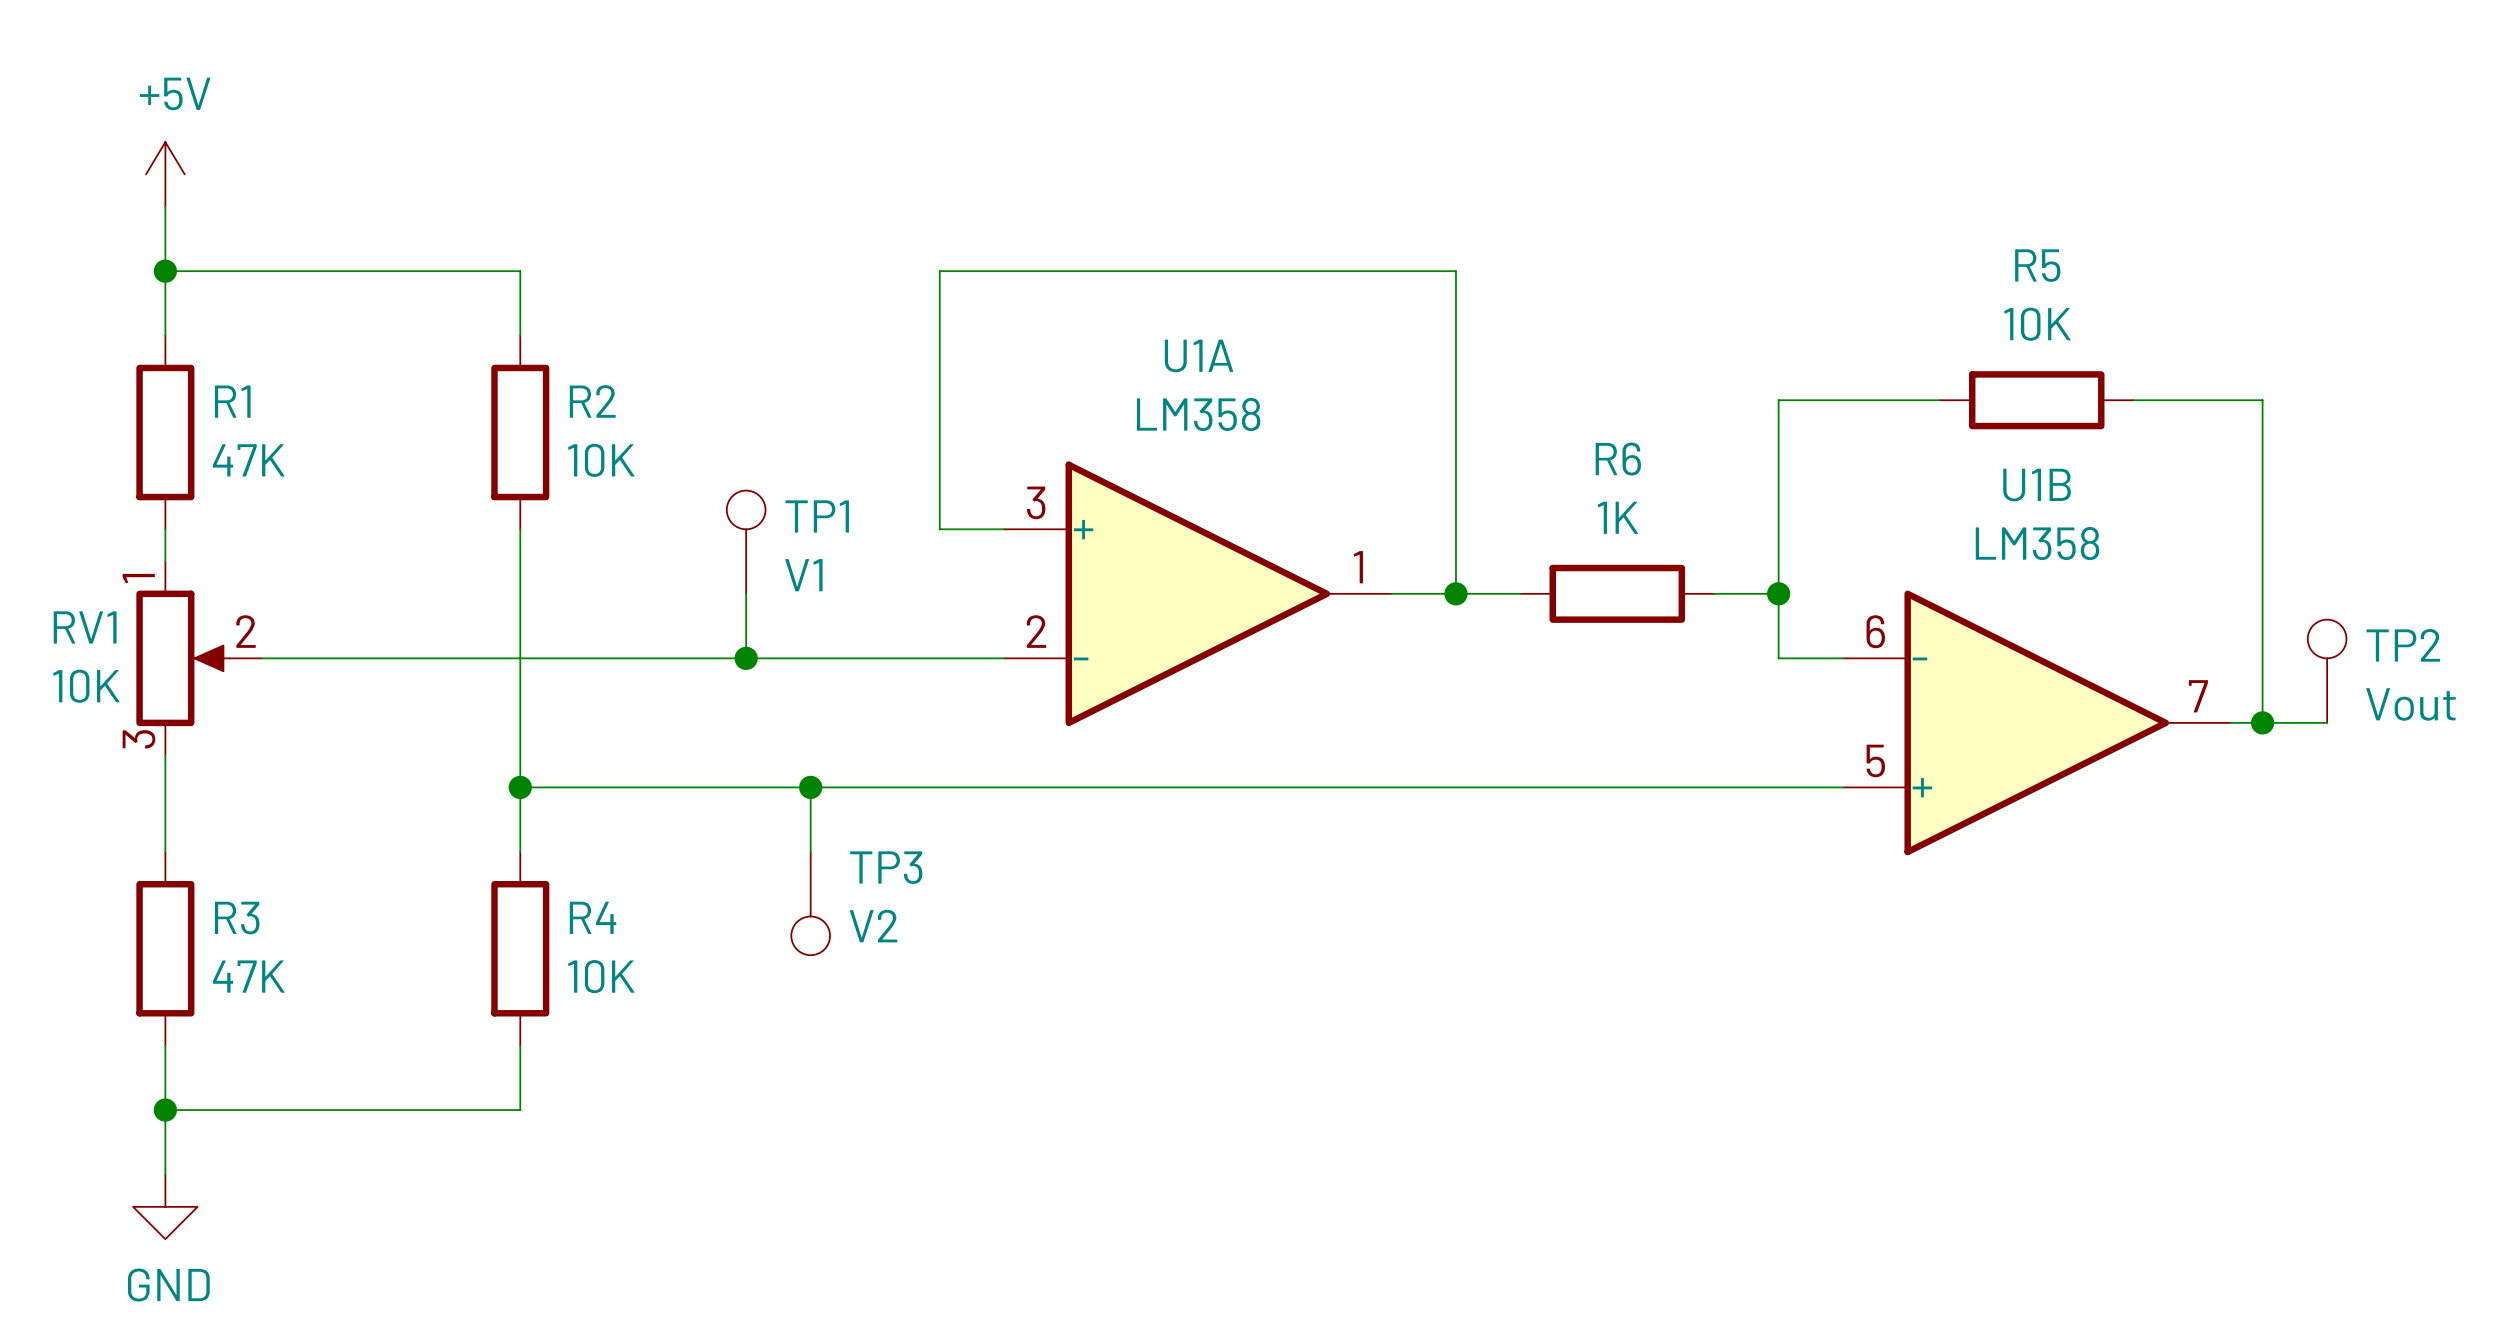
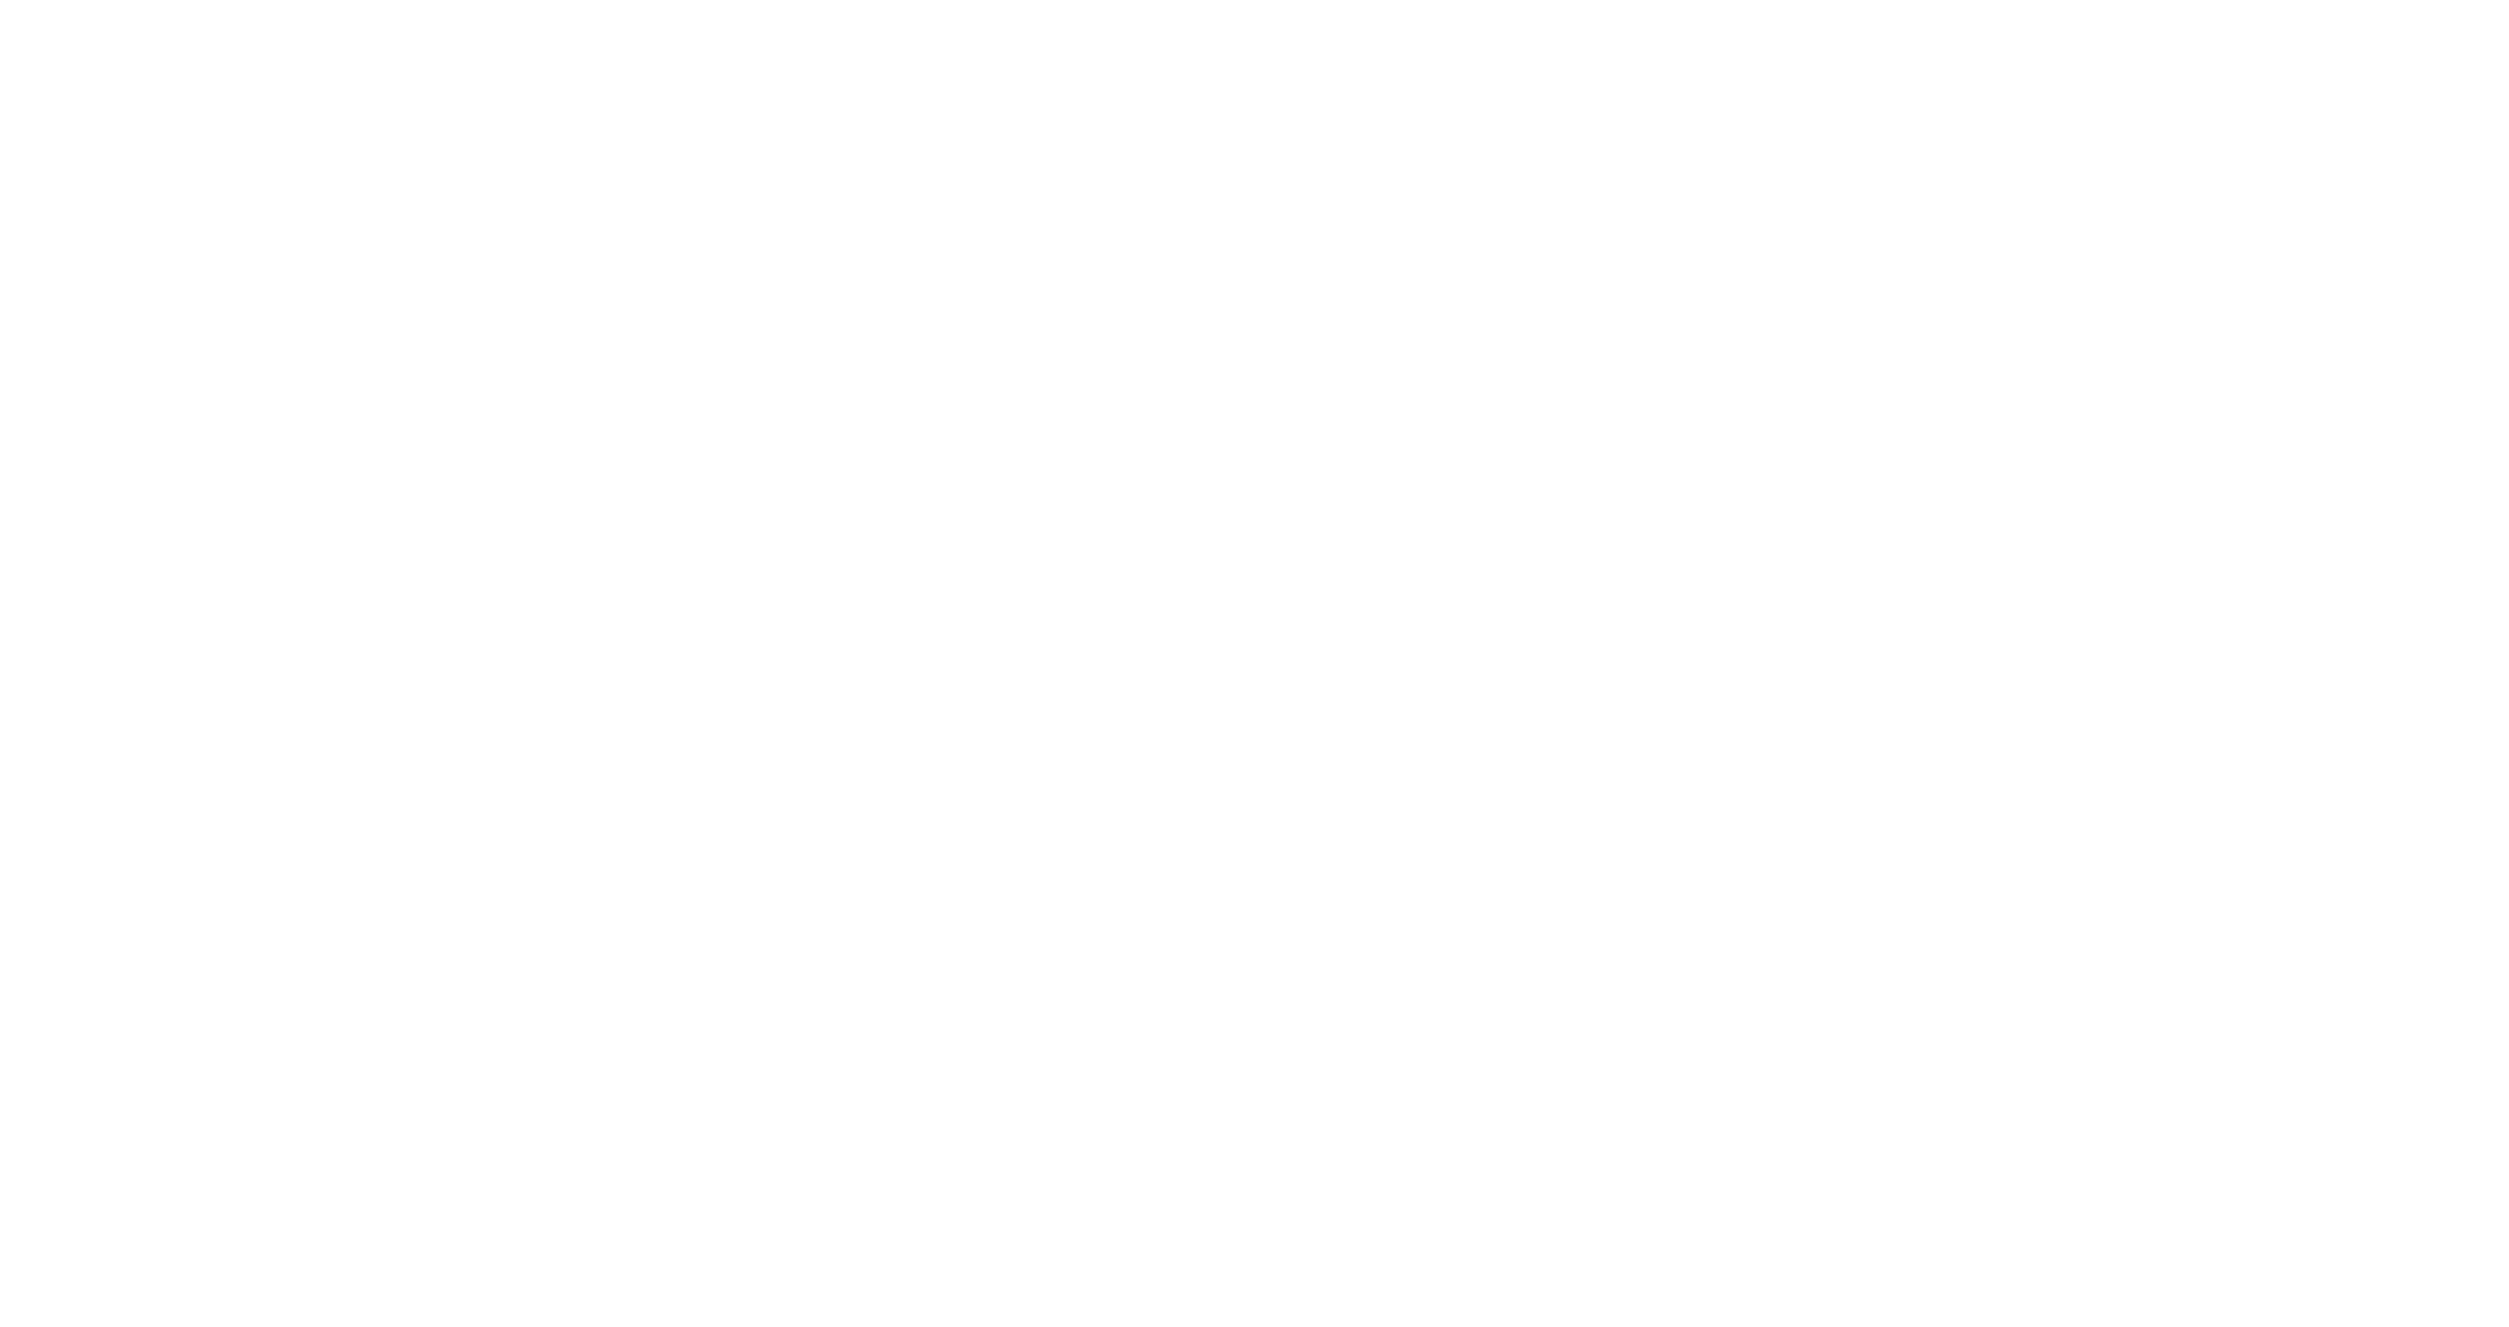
power symbol: +5V (165, 174) -> none
wire: (165, 206) (165, 335) -> none
wire: (165, 271) (520, 271) (520, 335) -> none
junction: (165, 271) -> none
wire: (1939, 400) (1778, 400) (1778, 658) (1843, 658) -> none
R5: 10K (2036, 400) -> none
wire: (2133, 400) (2262, 400) (2262, 722) -> none
R1: 47K (165, 432) -> none
R2: 10K (520, 432) -> none
wire: (165, 529) (165, 561) -> none
wire: (520, 529) (520, 851) -> none
wire: (1004, 529) (939, 529) (939, 271) (1455, 271) (1455, 593) -> none
TP1: V1 (746, 542) -> none
wire: (746, 593) (746, 658) -> none
U1A: LM358 (1197, 593) -> none
wire: (1391, 593) (1520, 593) -> none
junction: (1455, 593) -> none
R6: 1K (1617, 593) -> none
wire: (1714, 593) (1778, 593) -> none
junction: (1778, 593) -> none
RV1: 10K (199, 658) -> none
wire: (262, 658) (1004, 658) -> none
junction: (746, 658) -> none
TP2: Vout (2327, 671) -> none
U1B: LM358 (2036, 722) -> none
wire: (2230, 722) (2327, 722) -> none
junction: (2262, 722) -> none
wire: (165, 755) (165, 851) -> none
wire: (520, 787) (1843, 787) -> none
junction: (520, 787) -> none
wire: (810, 787) (810, 851) -> none
junction: (810, 787) -> none
TP3: V2 (810, 903) -> none
R3: 47K (165, 948) -> none
R4: 10K (520, 948) -> none
wire: (165, 1045) (165, 1174) -> none
wire: (520, 1045) (520, 1110) (165, 1110) -> none
junction: (165, 1110) -> none
power symbol: GND (165, 1206) -> none

